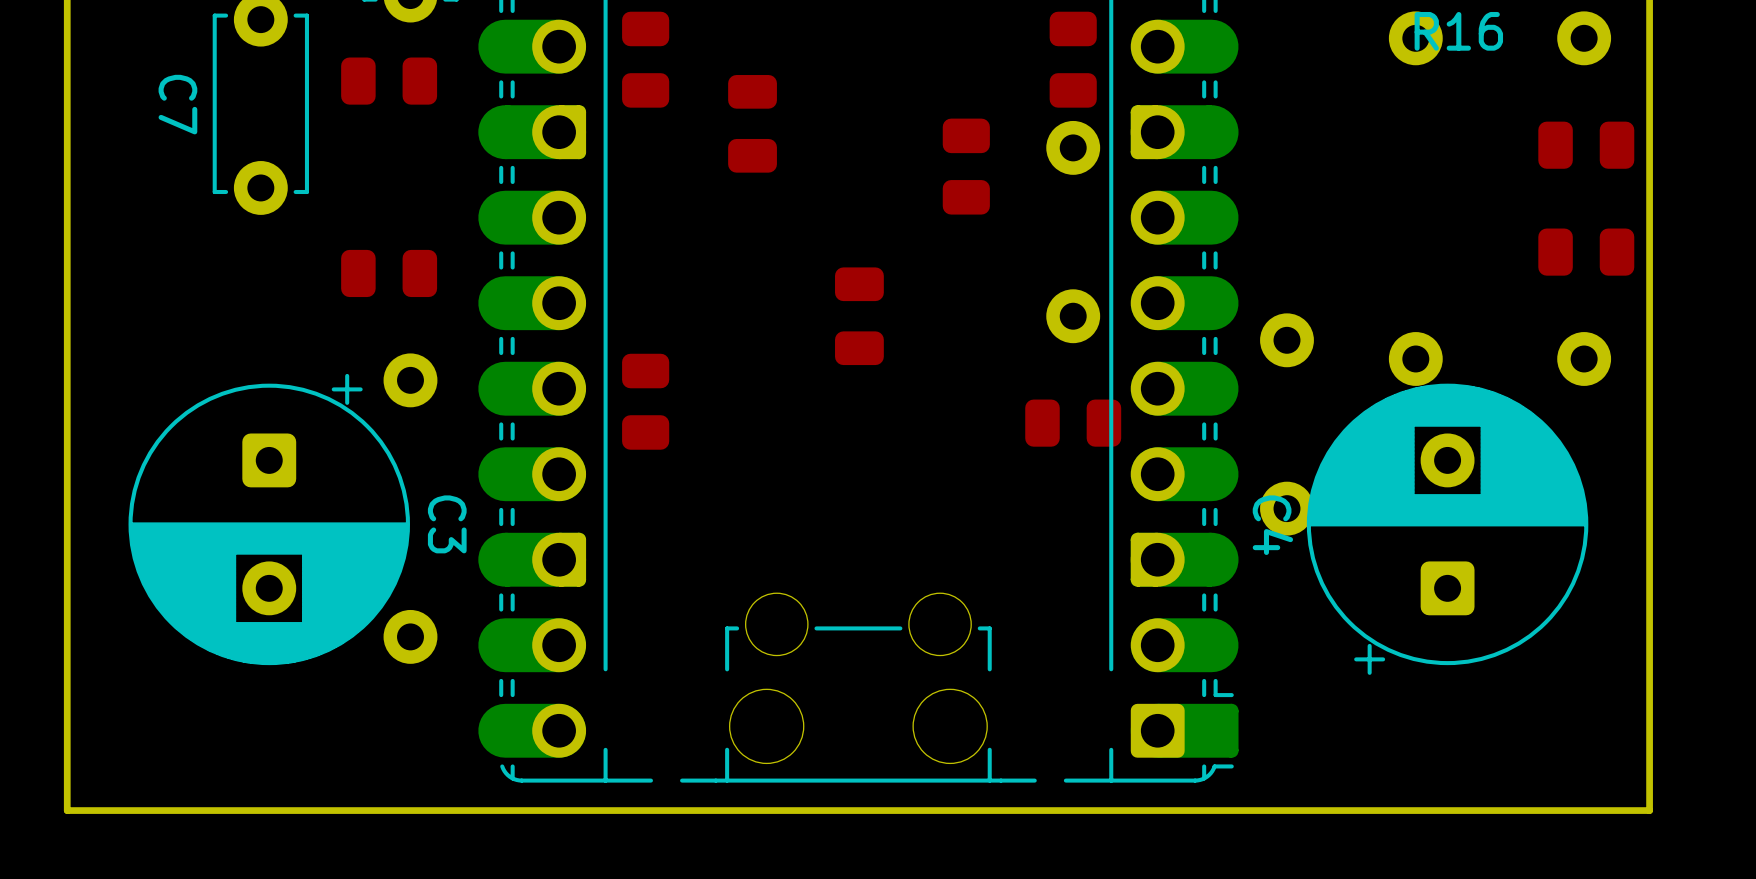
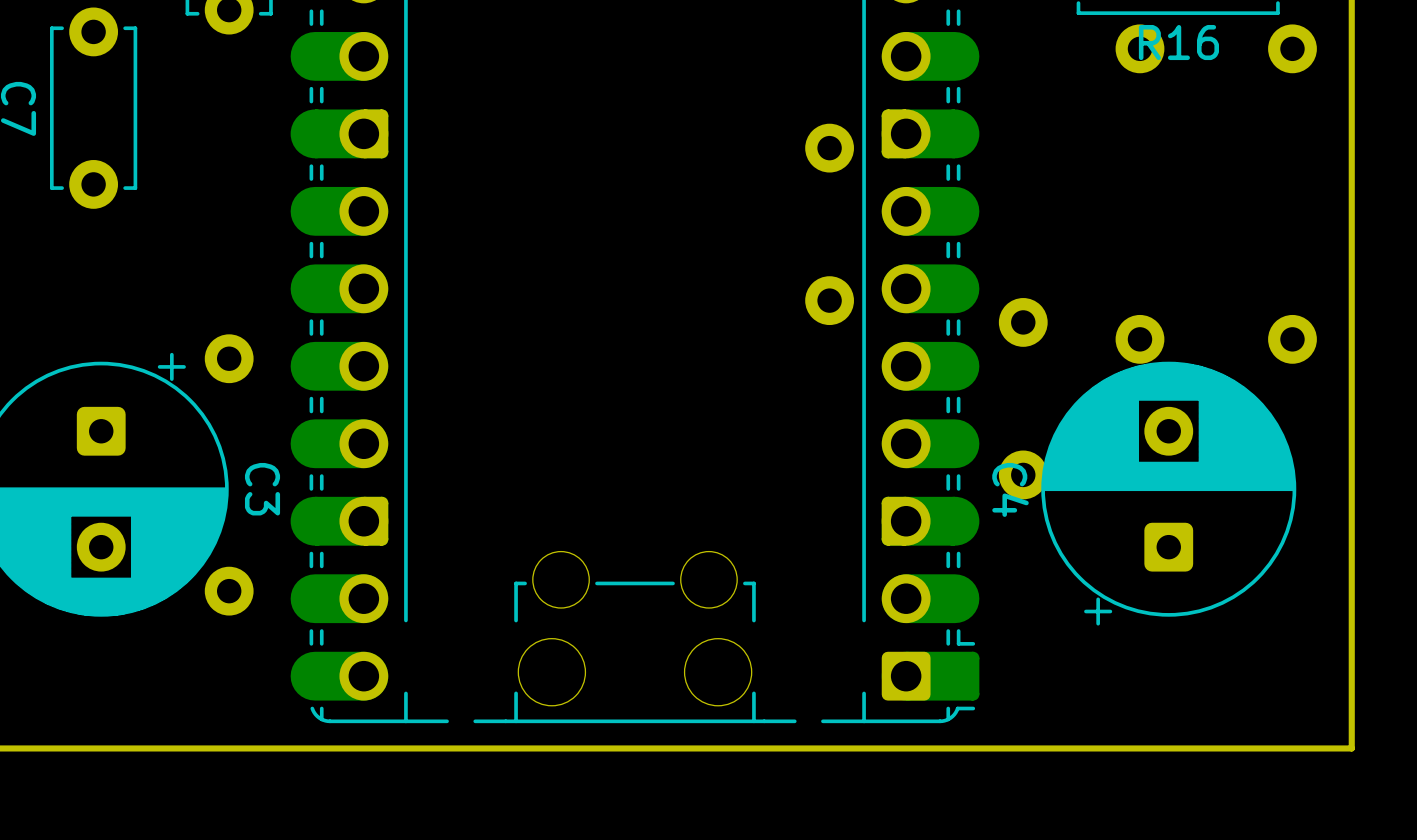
part: (645, 59) -> none
part: (1073, 59) -> none
part: (389, 81) -> none
part: (752, 123) -> none
part: (1586, 145) -> none
part: (966, 166) -> none
part: (1586, 252) -> none
part: (389, 273) -> none
part: (859, 316) -> none
part: (645, 401) -> none
part: (1073, 423) -> none

